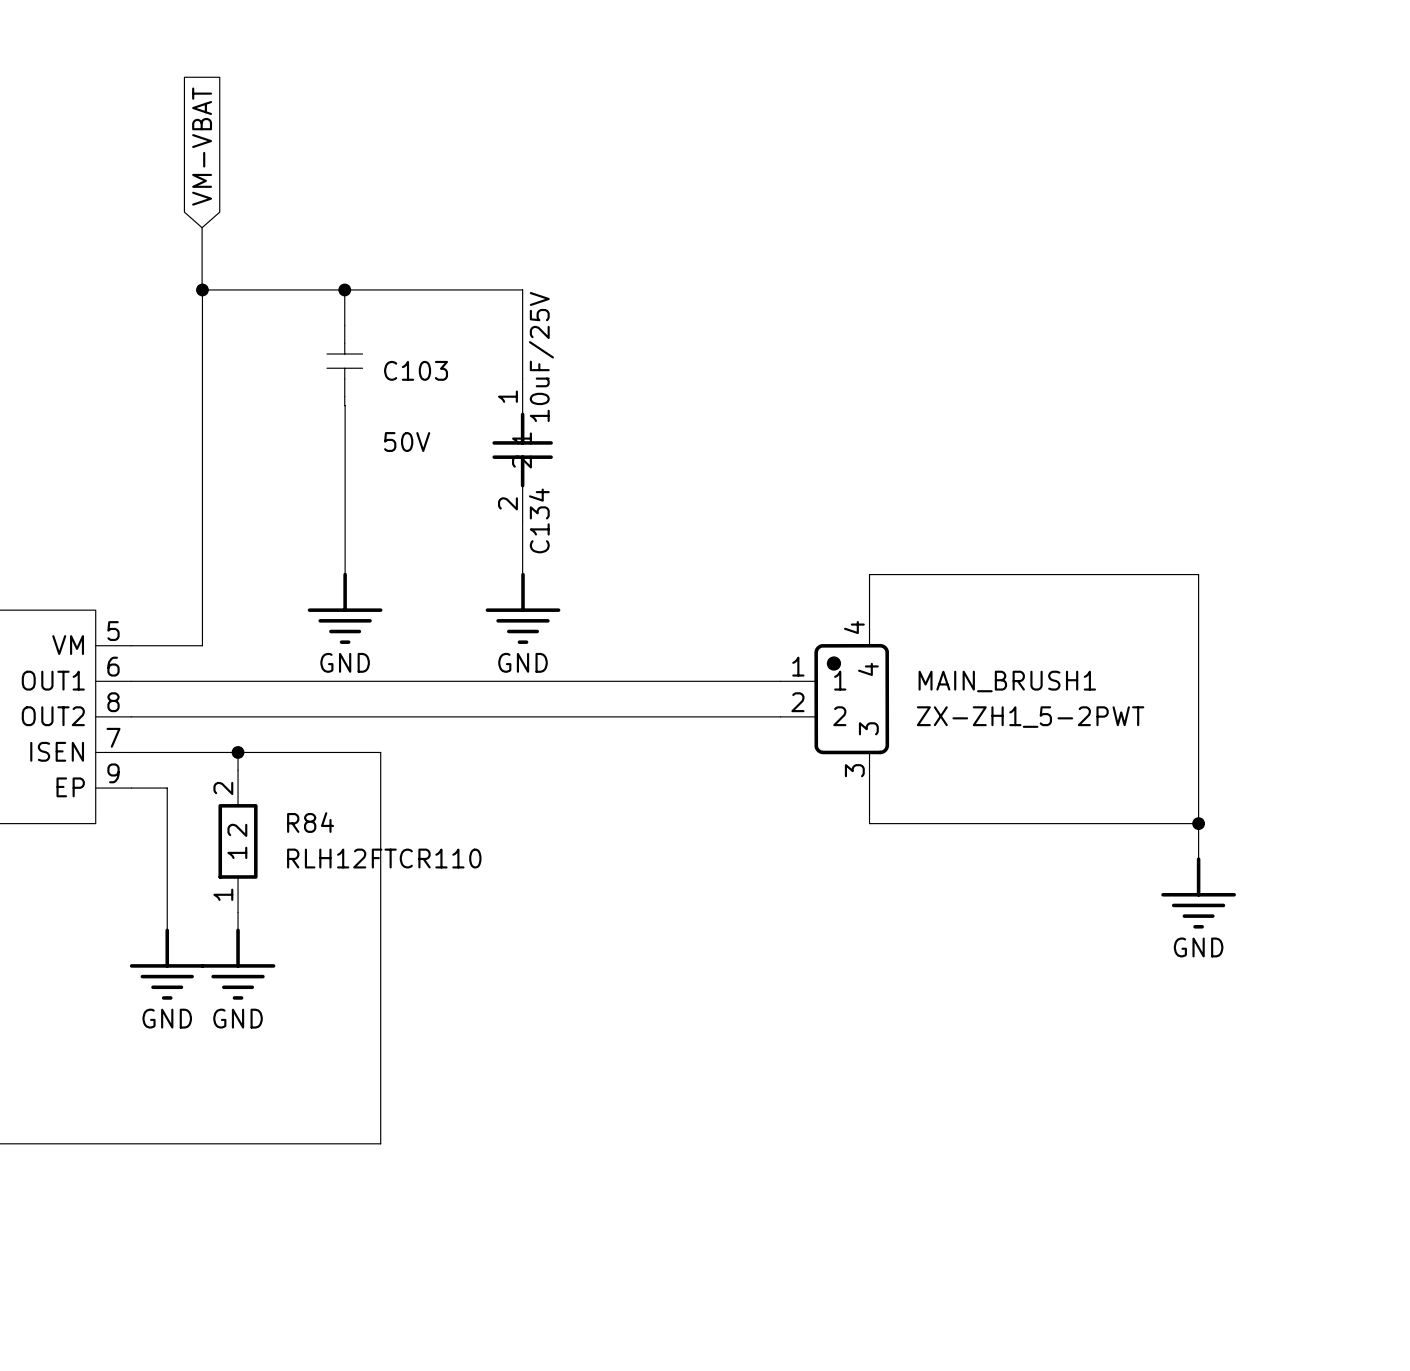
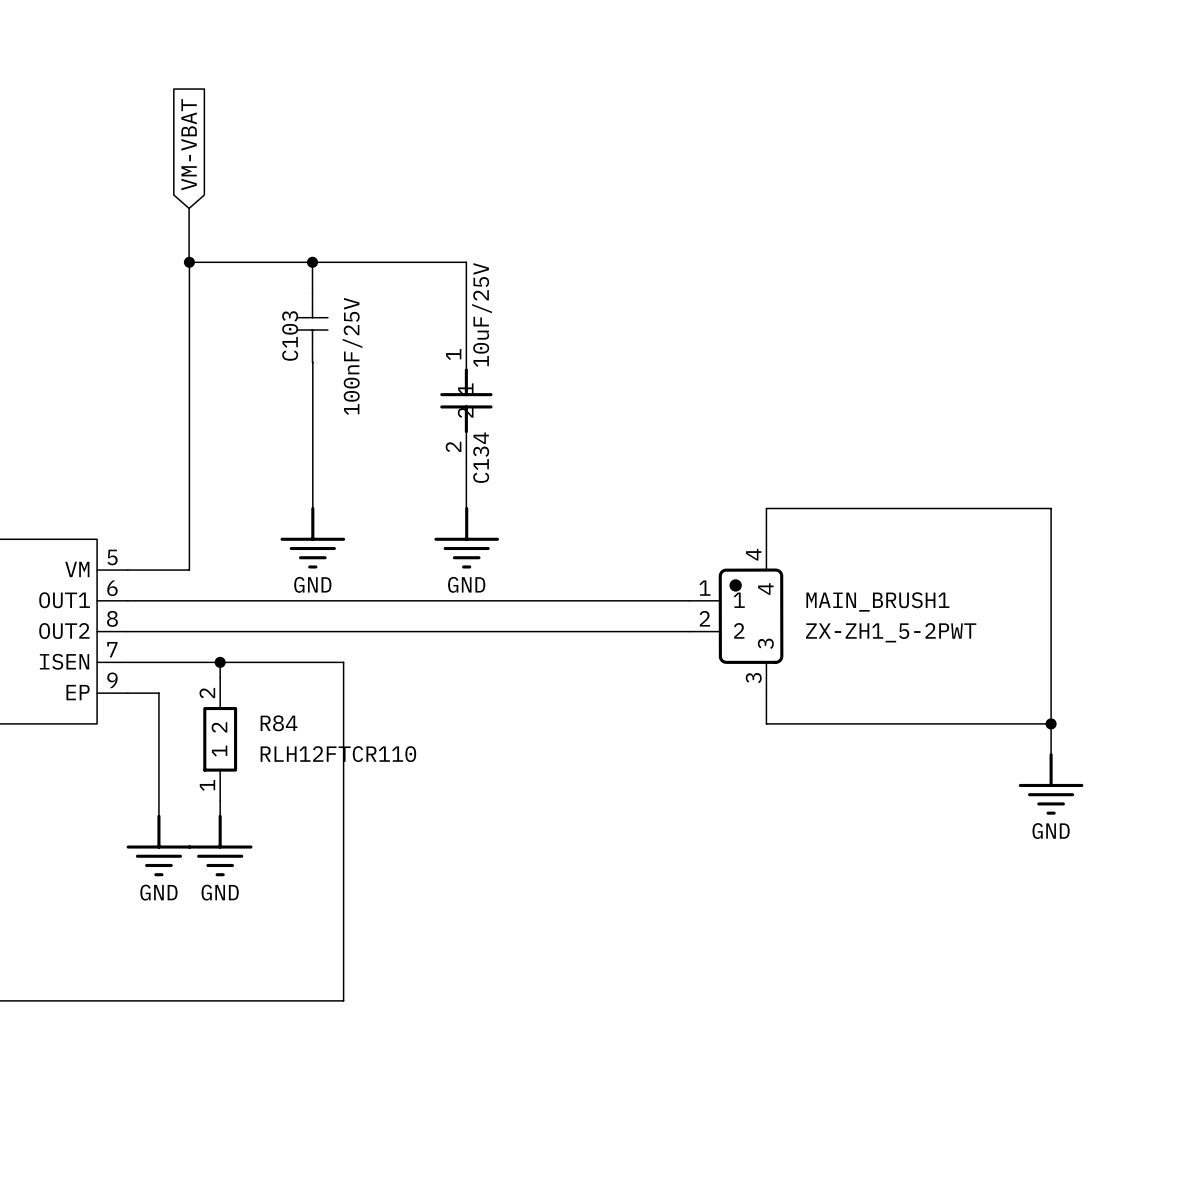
C103 name rotation: 0° (416, 370) -> 90° counterclockwise (290, 336)
C103 name position: C103 (416, 370) -> C103 (290, 336)
C103 value: none -> 100nF/25V (352, 356)
C103 text: 50V (407, 442) -> none

